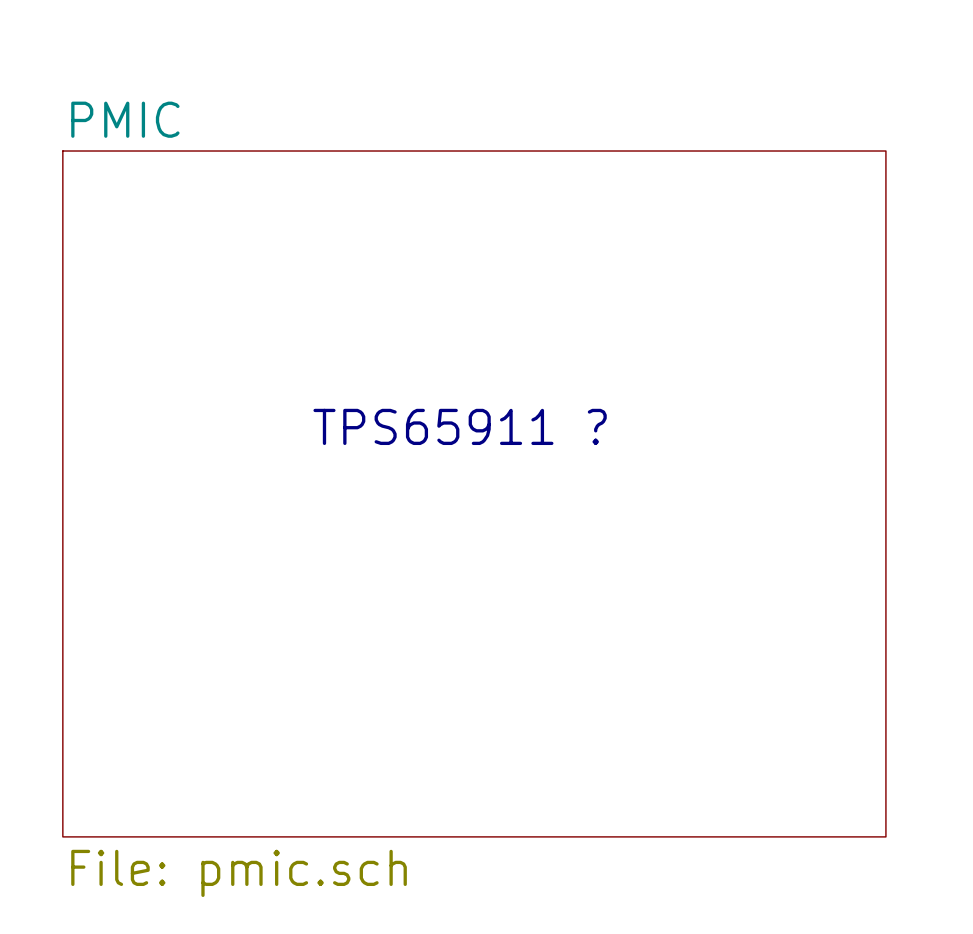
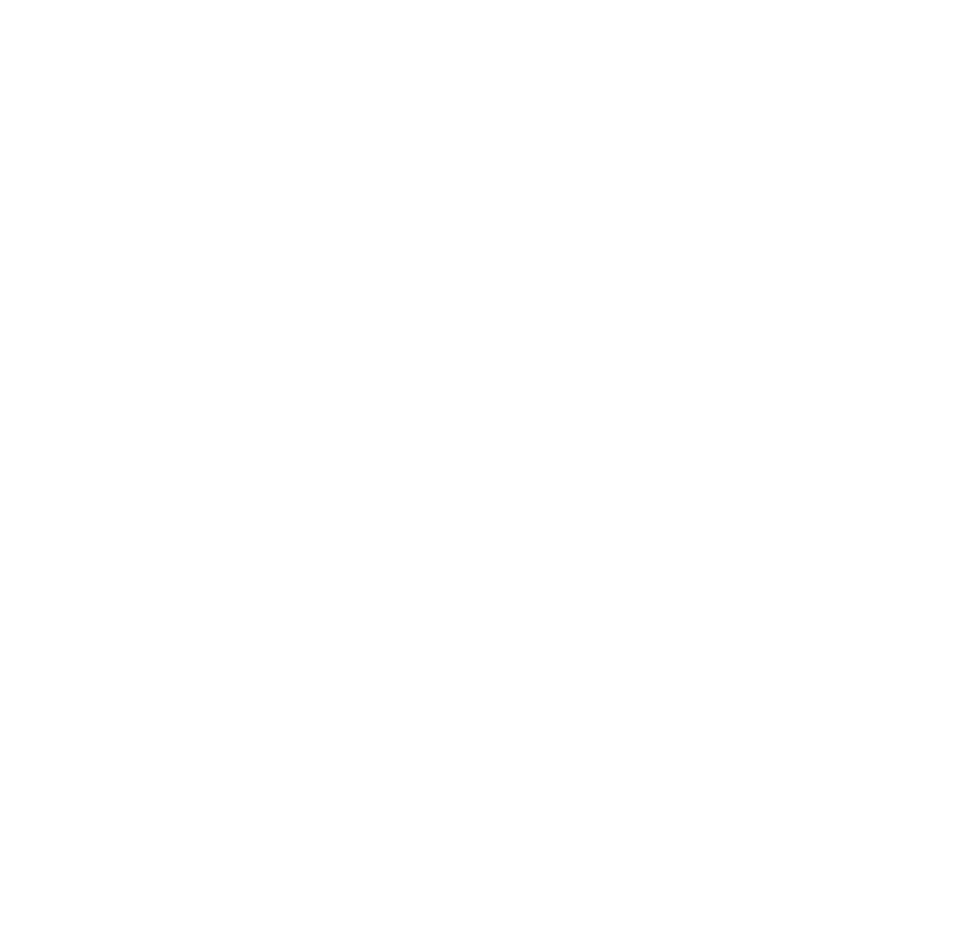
text: TPS65911 ? (460, 426) -> none
sheet PMIC: File: pmic.sch (474, 493) -> none

